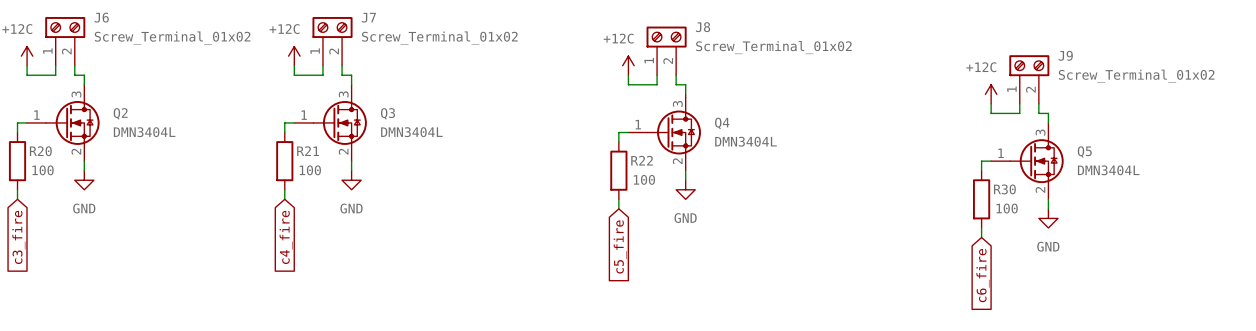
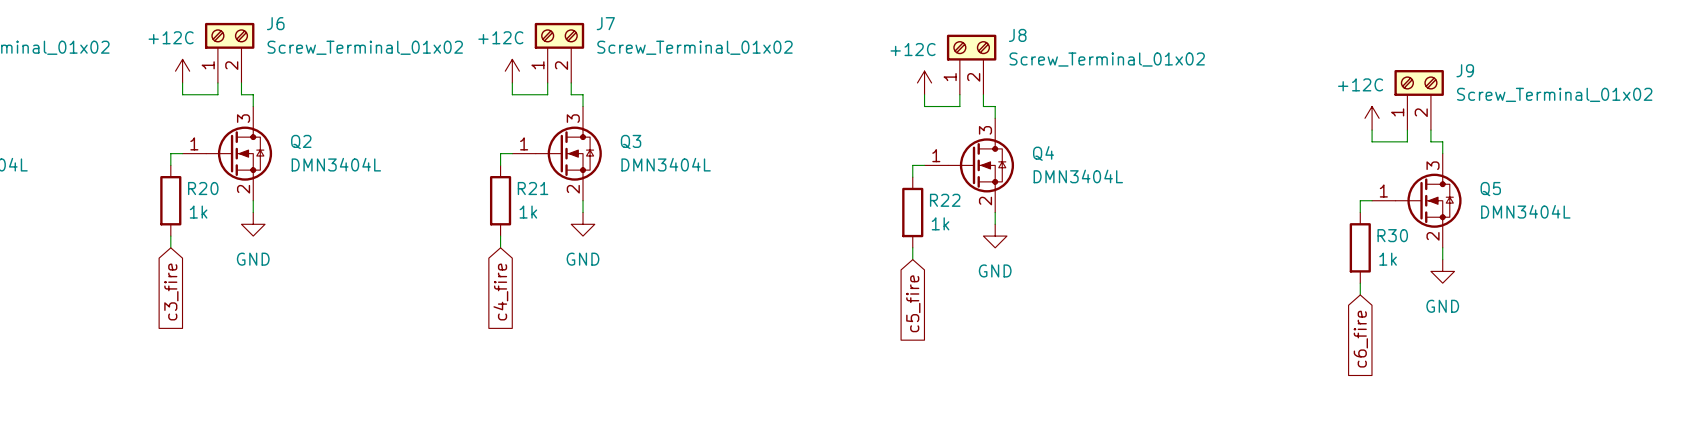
R20 value: 100 (43, 170) -> 1k (198, 212)
R21 value: 100 (310, 170) -> 1k (528, 212)
R22 value: 100 (644, 179) -> 1k (940, 223)
R30 value: 100 (1007, 208) -> 1k (1388, 259)

